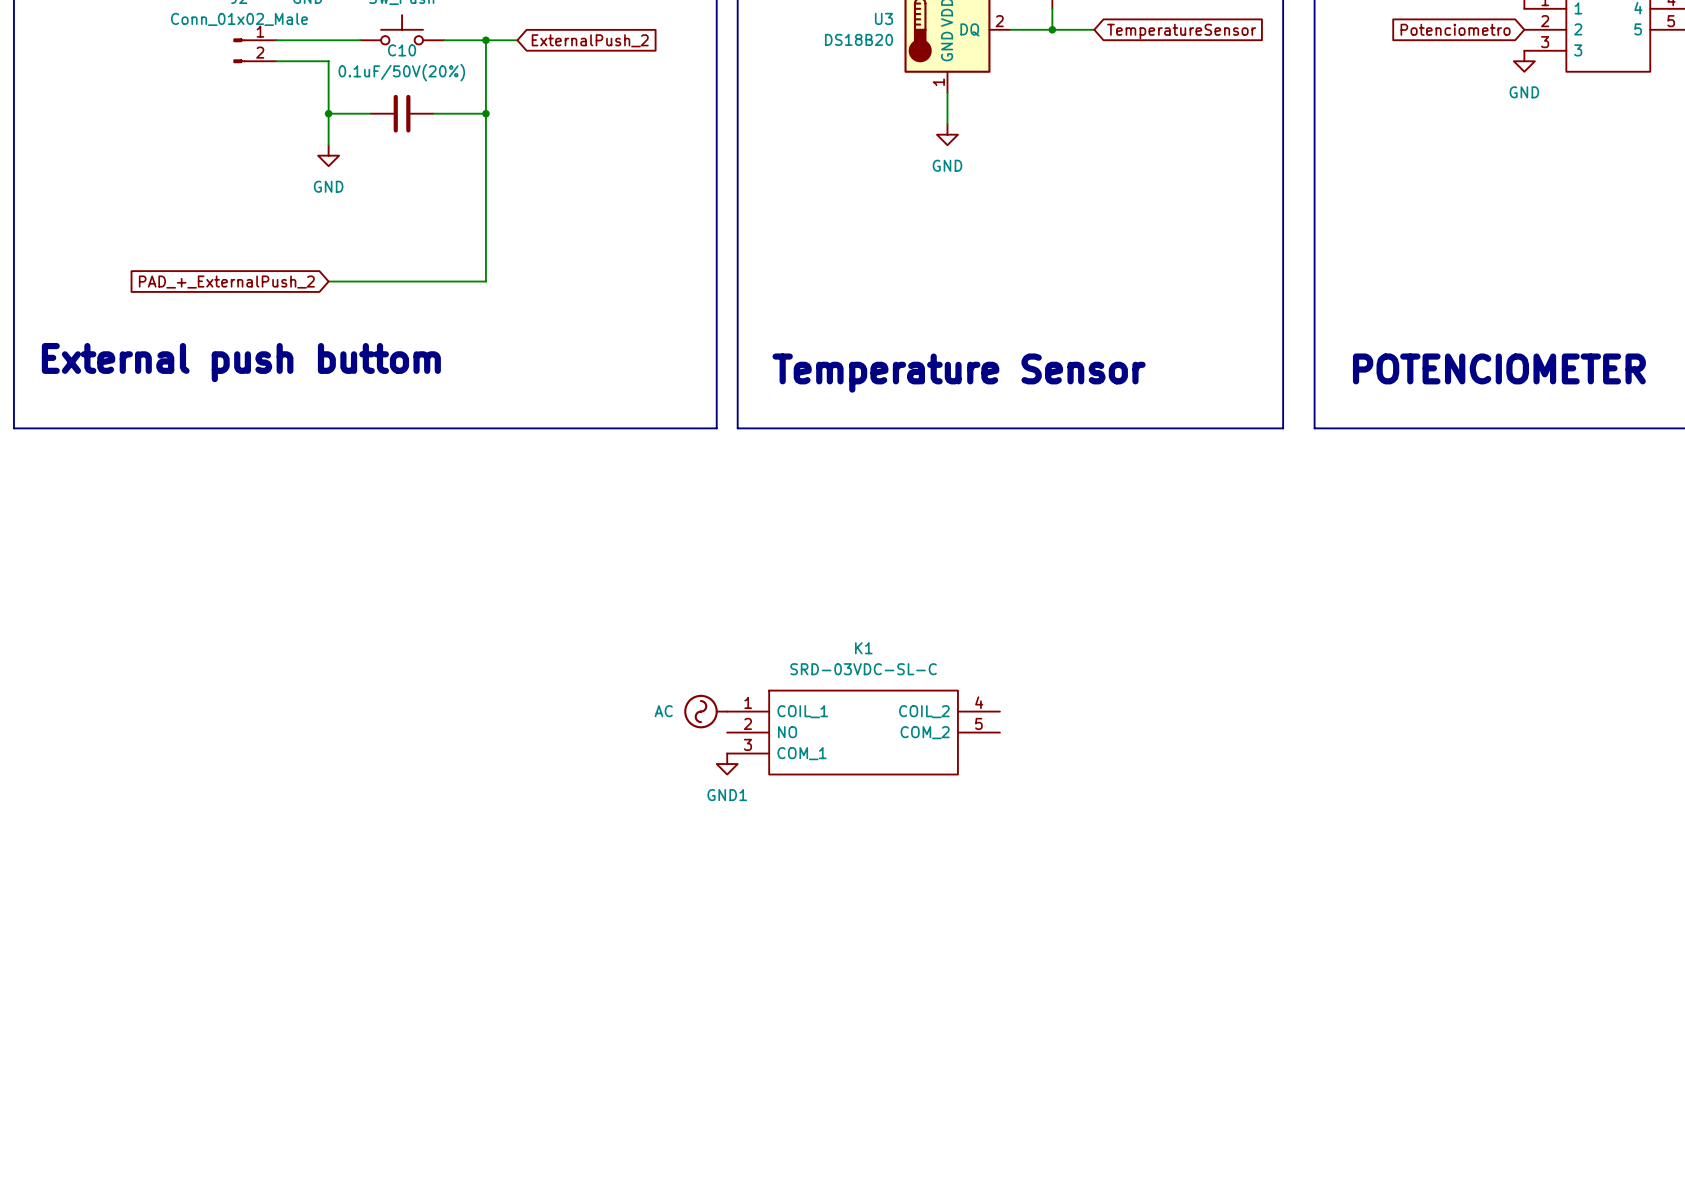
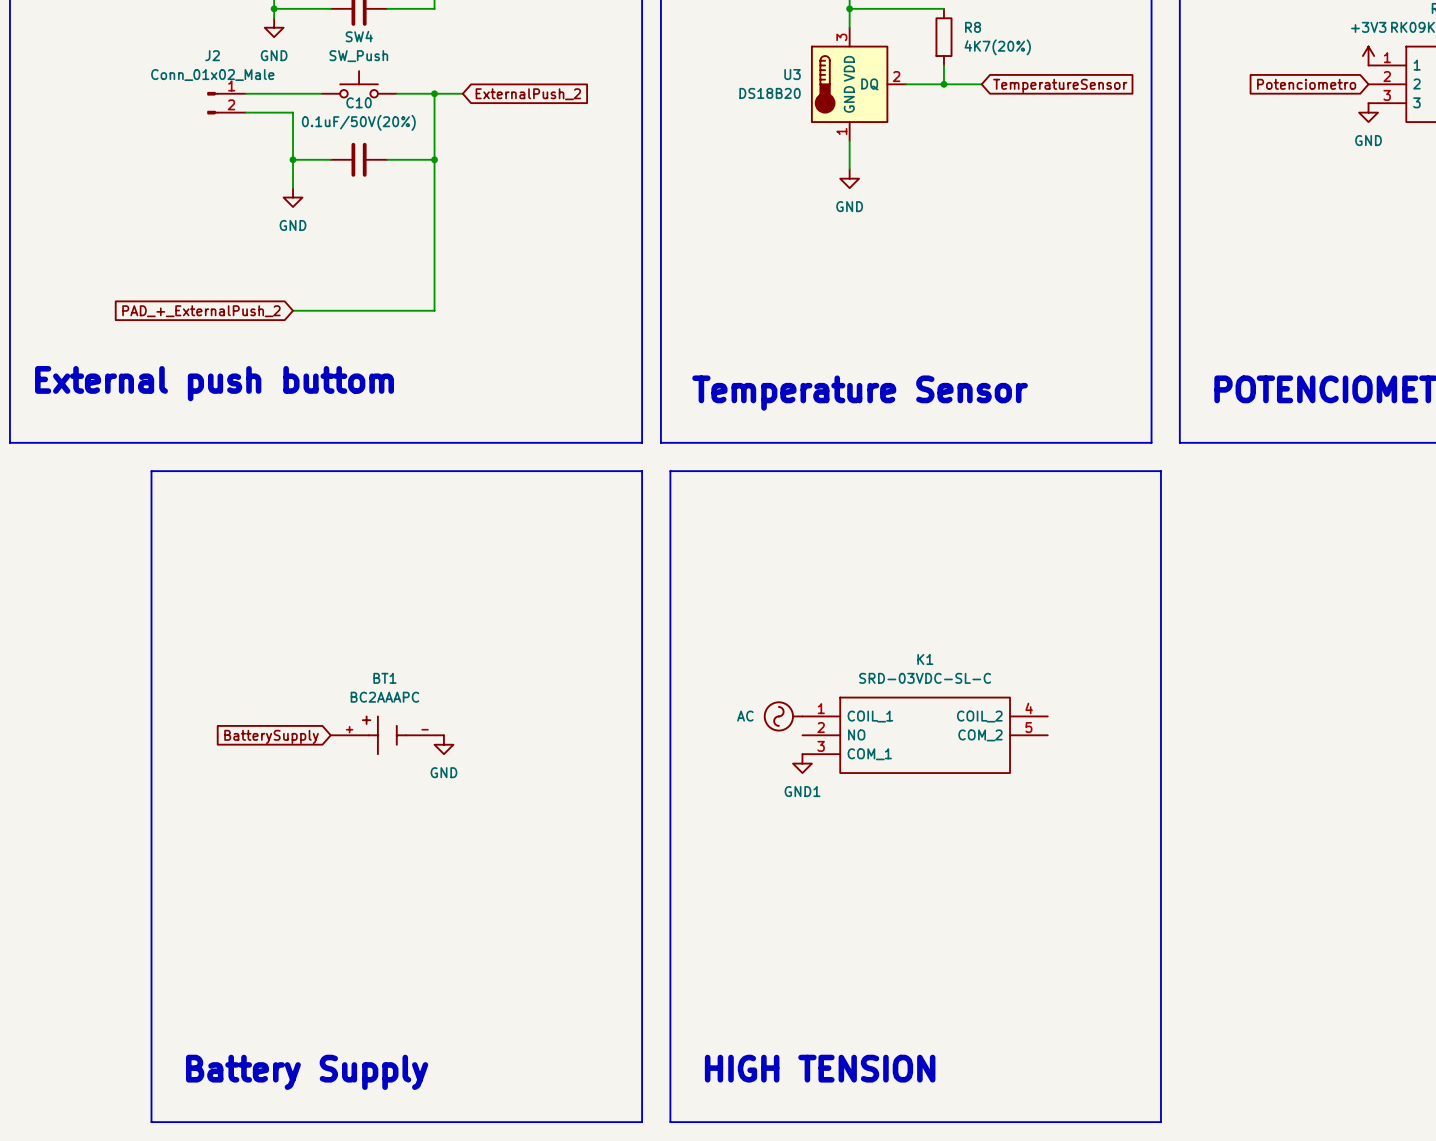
line: none -> (151, 471) (642, 471) (642, 1122) (151, 1122) (151, 471)
line: none -> (670, 471) (670, 1122) (1160, 1122) (1160, 471) (670, 471)
power symbol position: AC (705, 711) -> AC (783, 716)
K1 position: (863, 732) -> (925, 735)
BT1: none -> BC2AAAPC (387, 735)
global label: none -> BatterySupply (271, 736)
power symbol: none -> GND (443, 744)
power symbol position: GND1 (727, 764) -> GND1 (802, 763)
text: none -> HIGH TENSION (820, 1068)
text: none -> Battery Supply (307, 1072)

